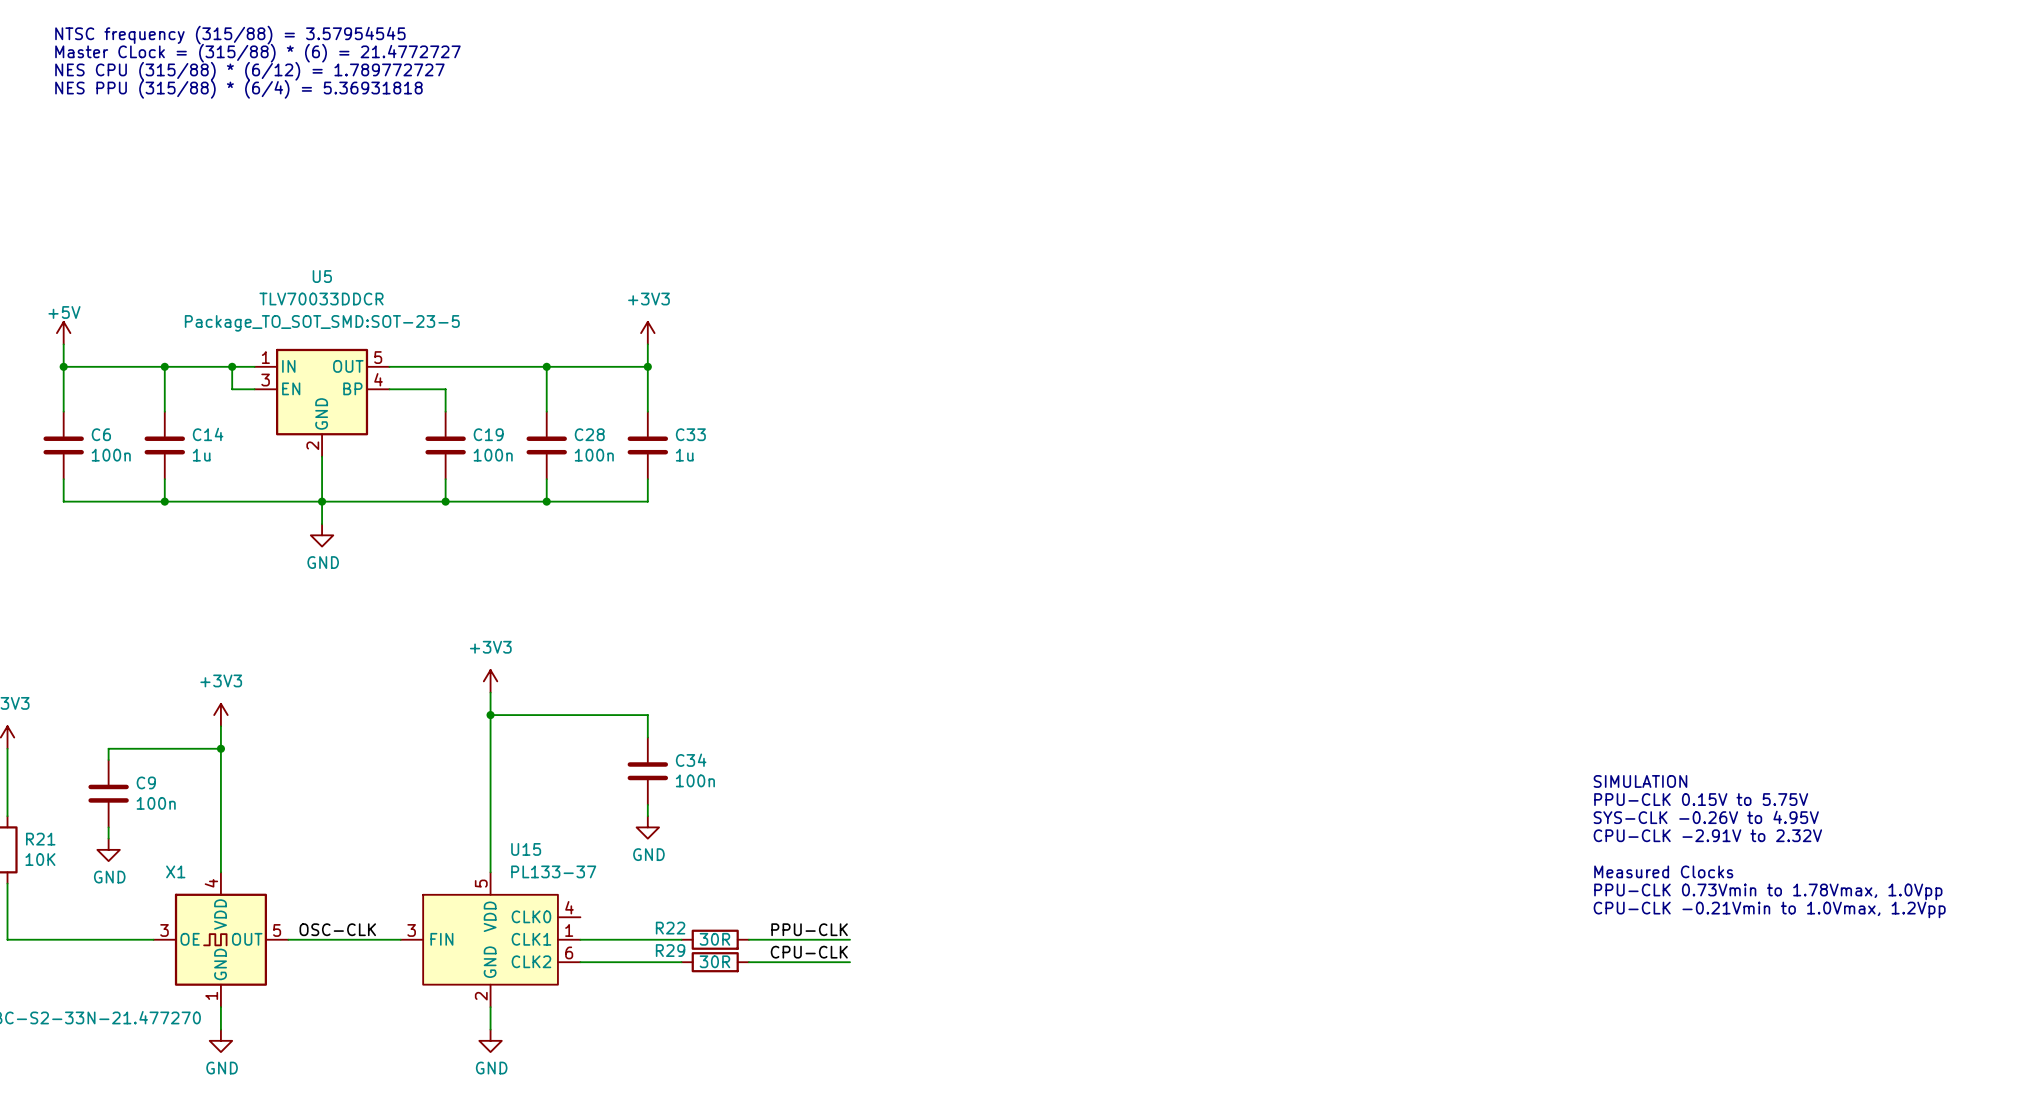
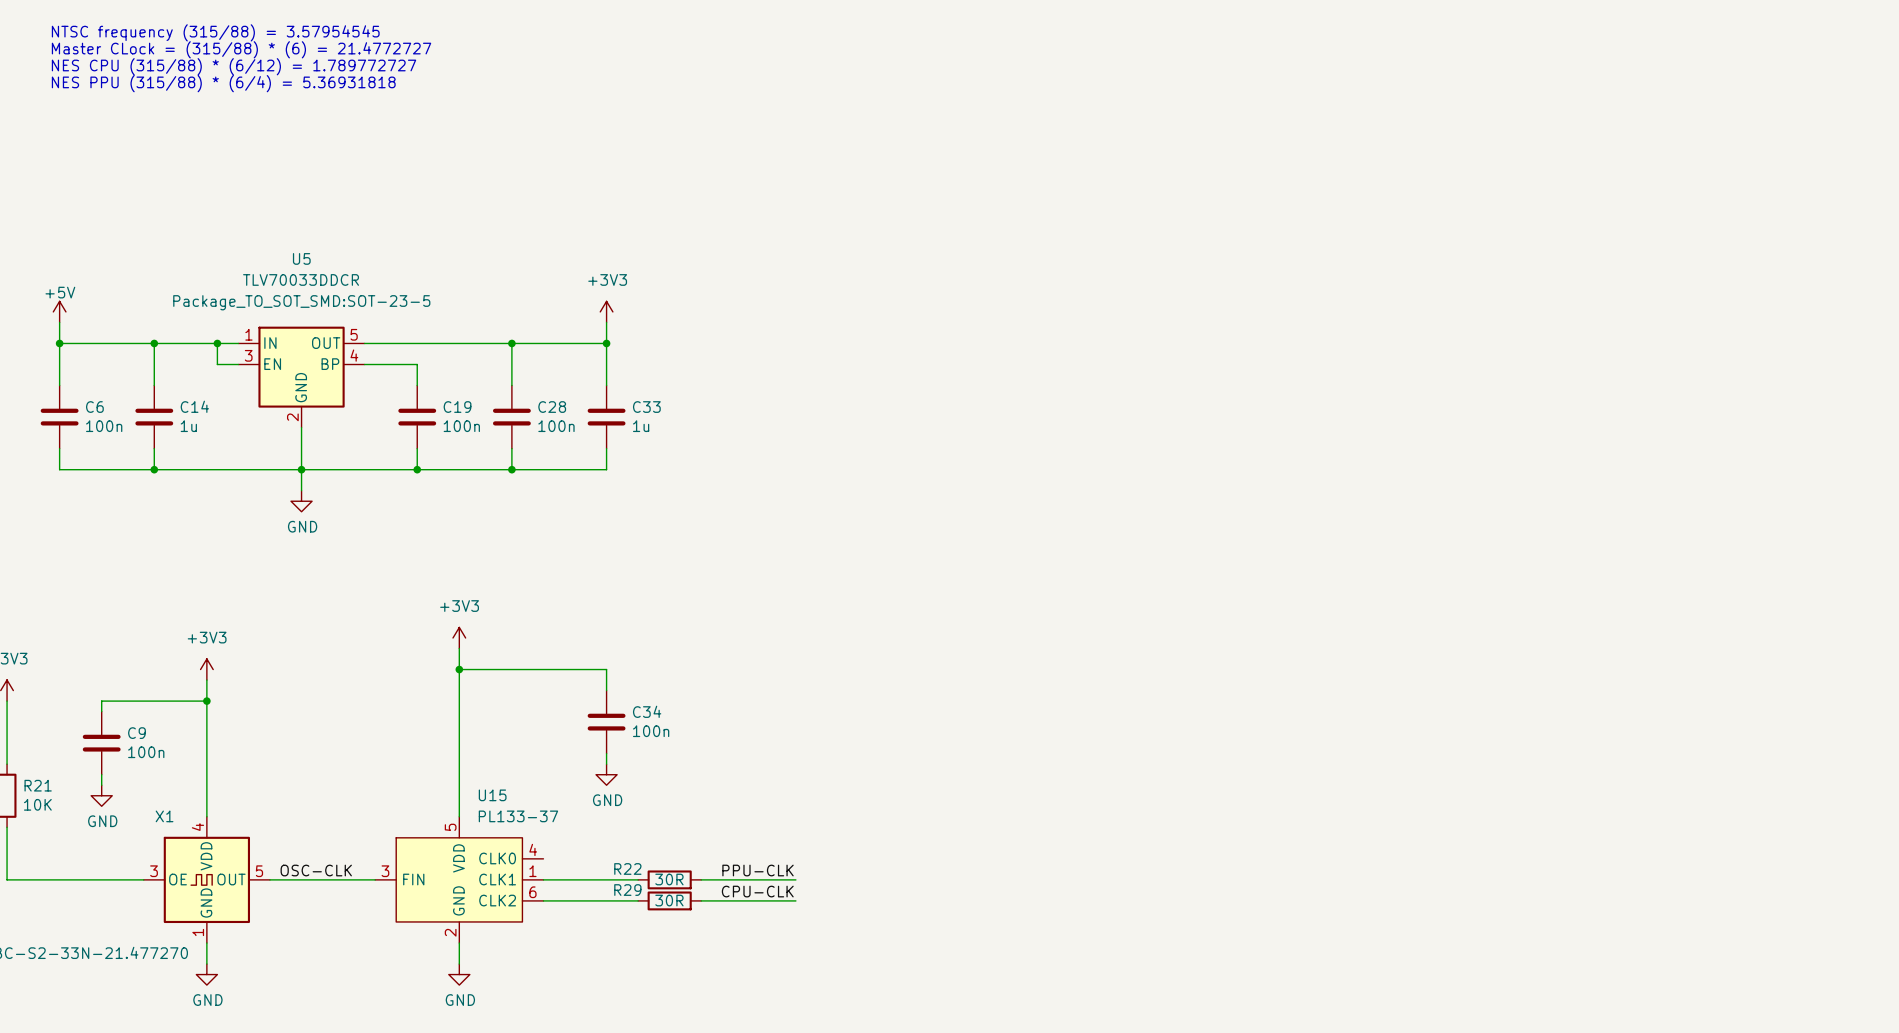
text: SIMULATION (1640, 781) -> none
text: PPU-CLK 0.15V to 5.75V (1701, 799) -> none
text: SYS-CLK -0.26V to 4.95V (1706, 817) -> none
text: CPU-CLK -2.91V to 2.32V (1707, 835) -> none
text: Measured Clocks (1663, 871) -> none
text: PPU-CLK 0.73Vmin to 1.78Vmax, 1.0Vpp (1768, 891) -> none
text: CPU-CLK -0.21Vmin to 1.0Vmax, 1.2Vpp (1769, 909) -> none

